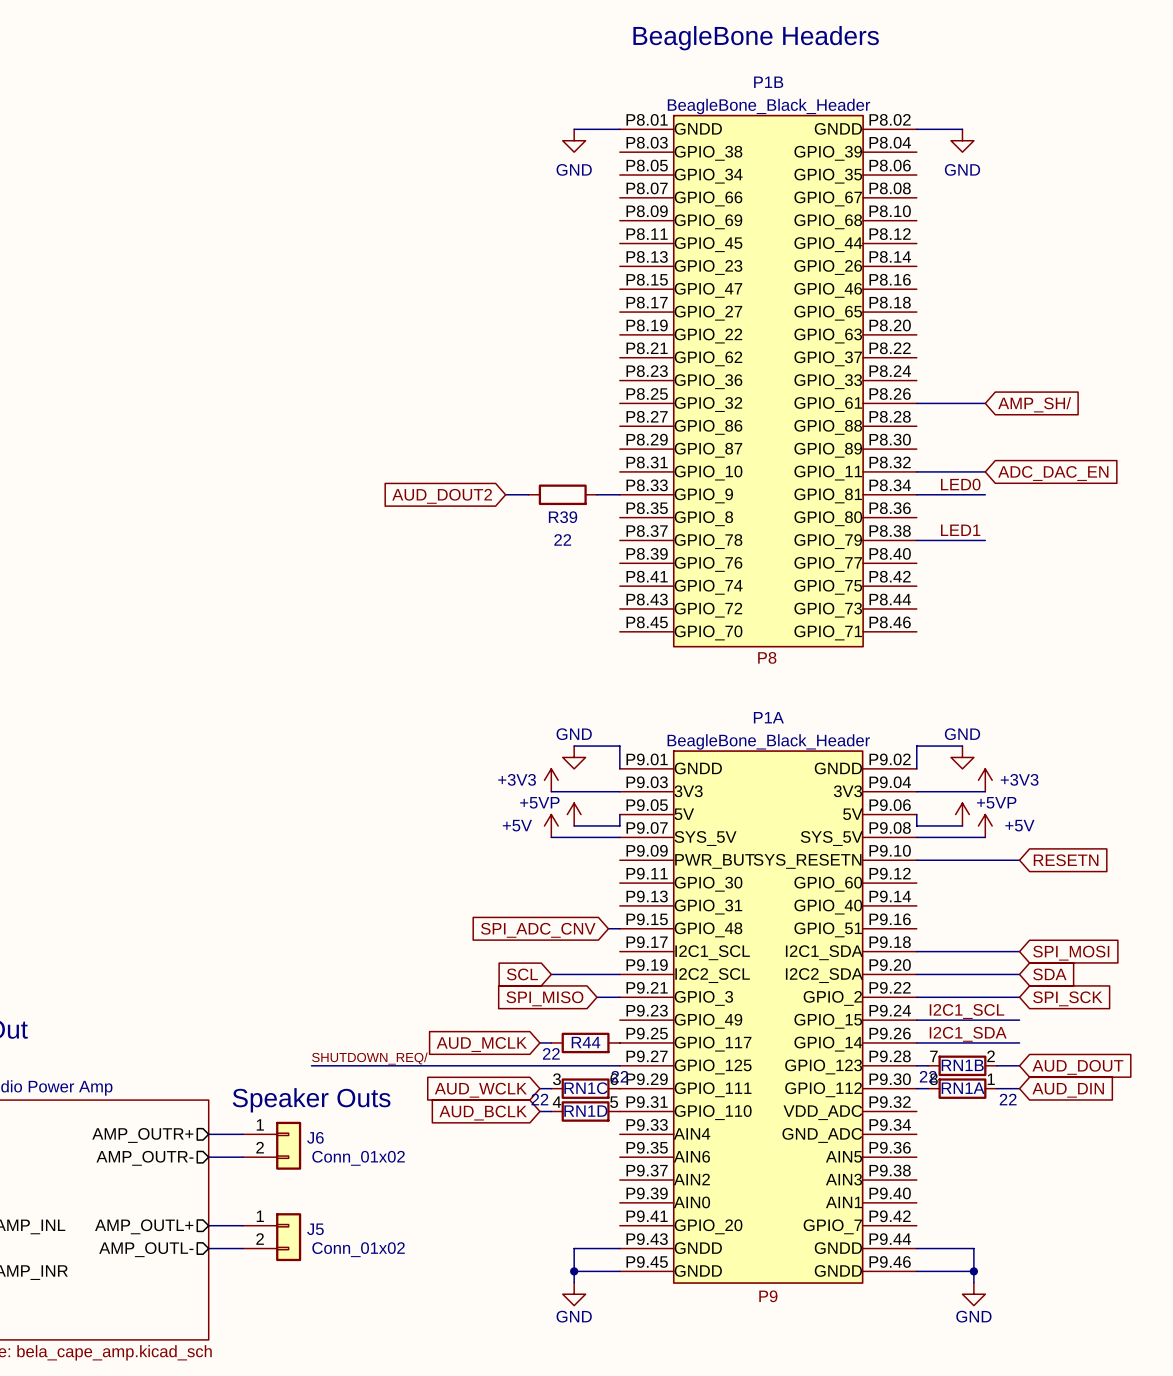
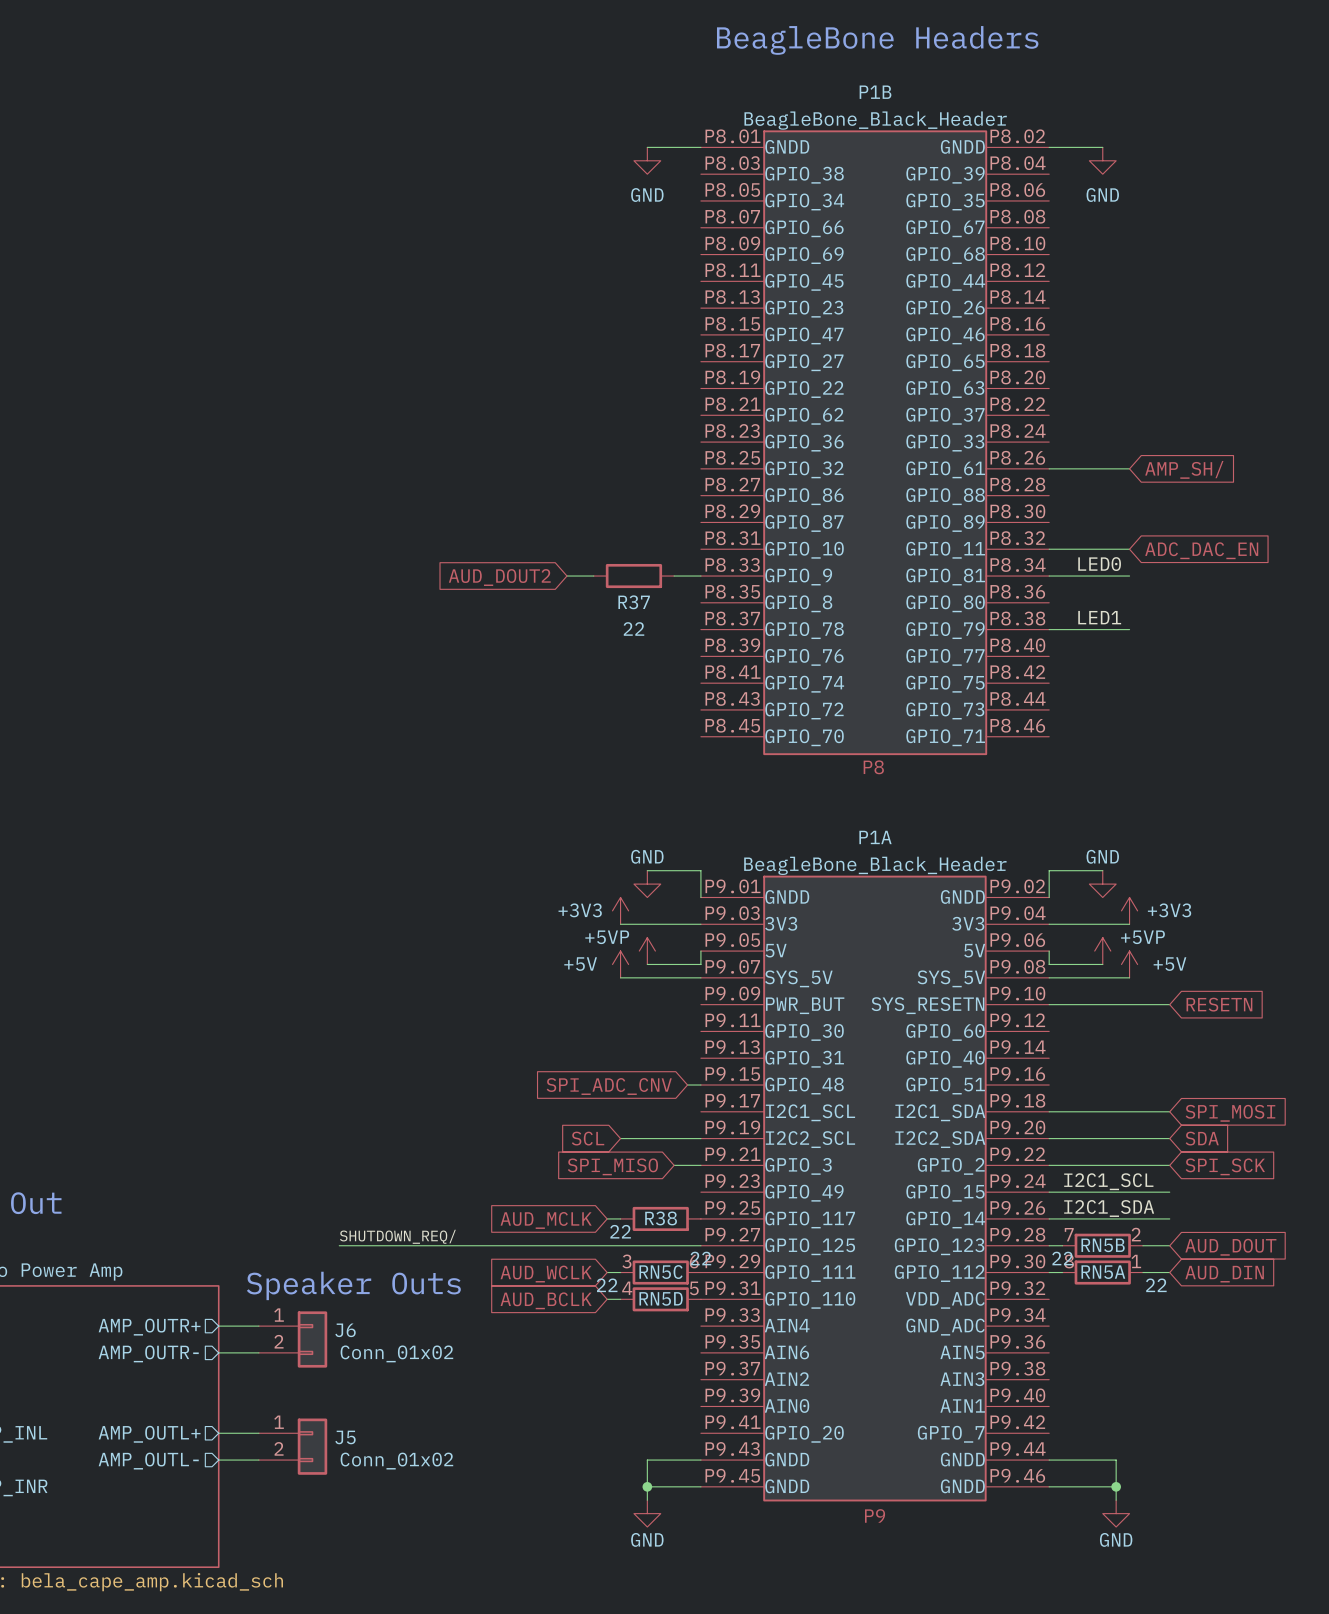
R39 name: R39 (563, 517) -> R37 (634, 602)
R44 name: R44 (586, 1042) -> R38 (661, 1218)
RN1B name: RN1B (962, 1065) -> RN5B (1103, 1245)
RN1C name: RN1C (585, 1088) -> RN5C (661, 1272)
RN1A name: RN1A (963, 1088) -> RN5A (1103, 1272)
RN1D name: RN1D (585, 1111) -> RN5D (661, 1298)

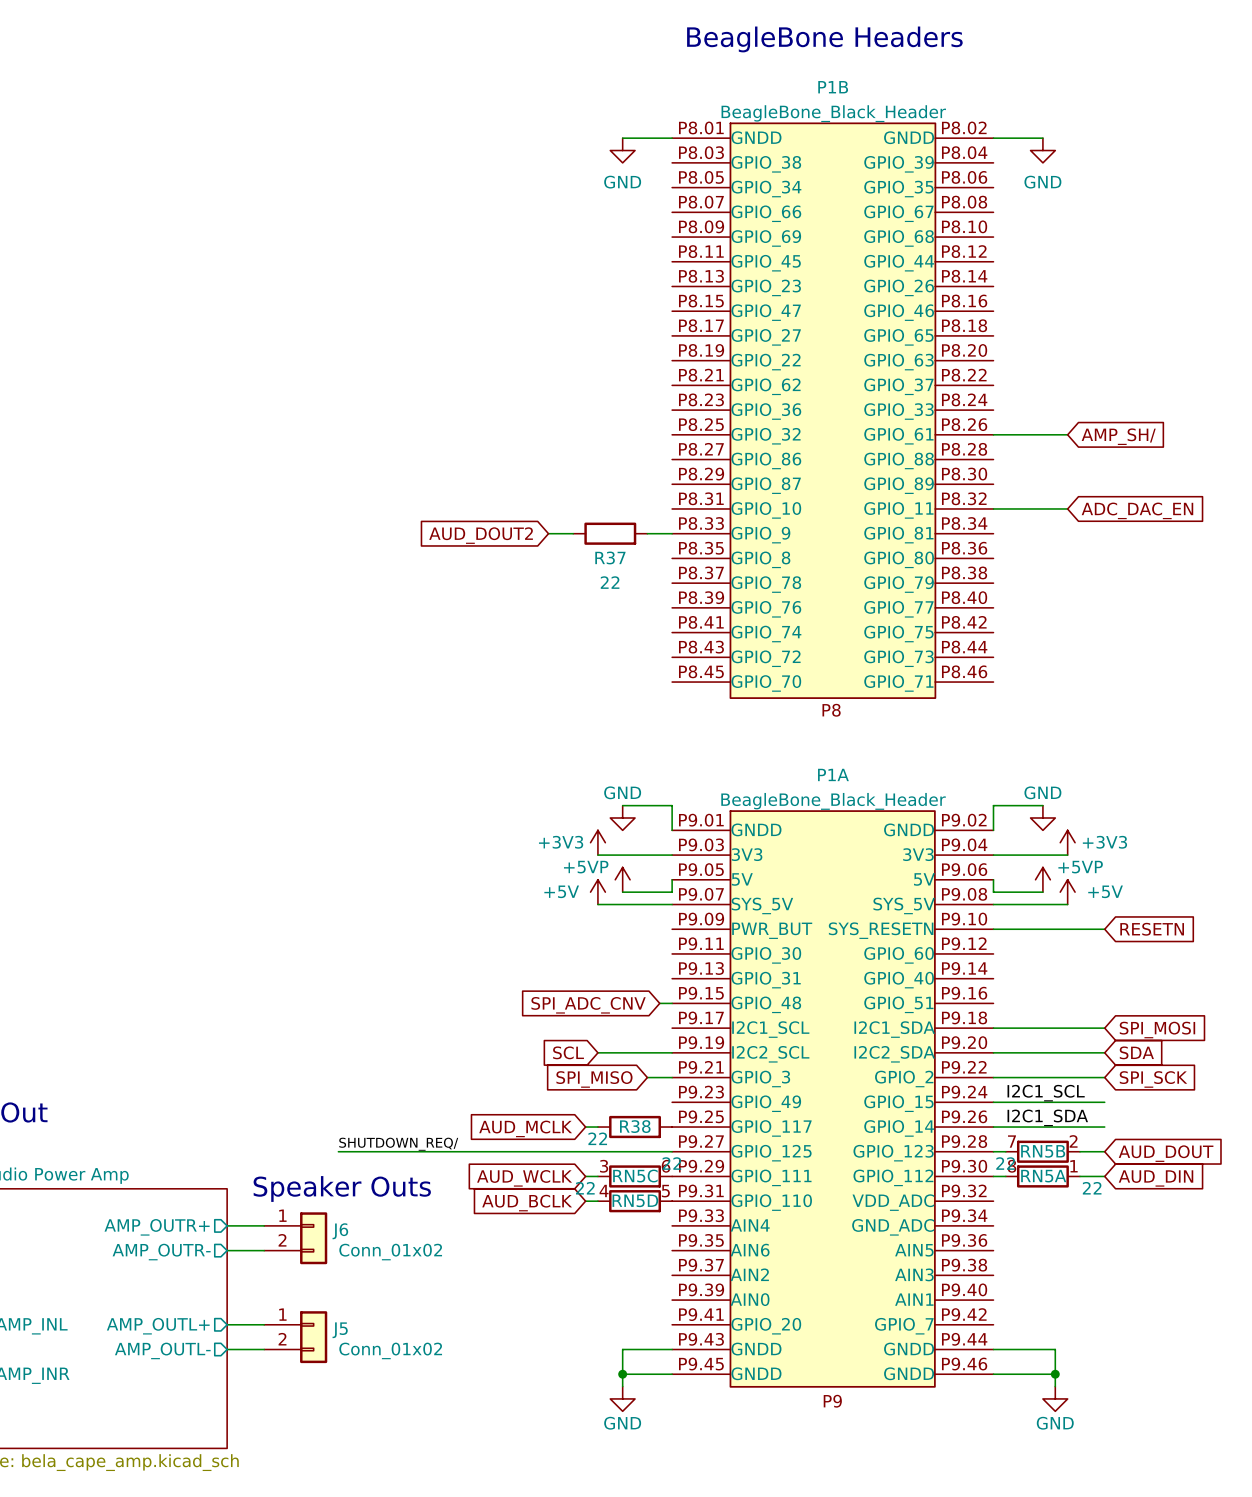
label: LED0 (1099, 564) -> none
wire: (1049, 576) (1129, 576) -> none
label: LED1 (1099, 617) -> none
wire: (1049, 629) (1129, 629) -> none

